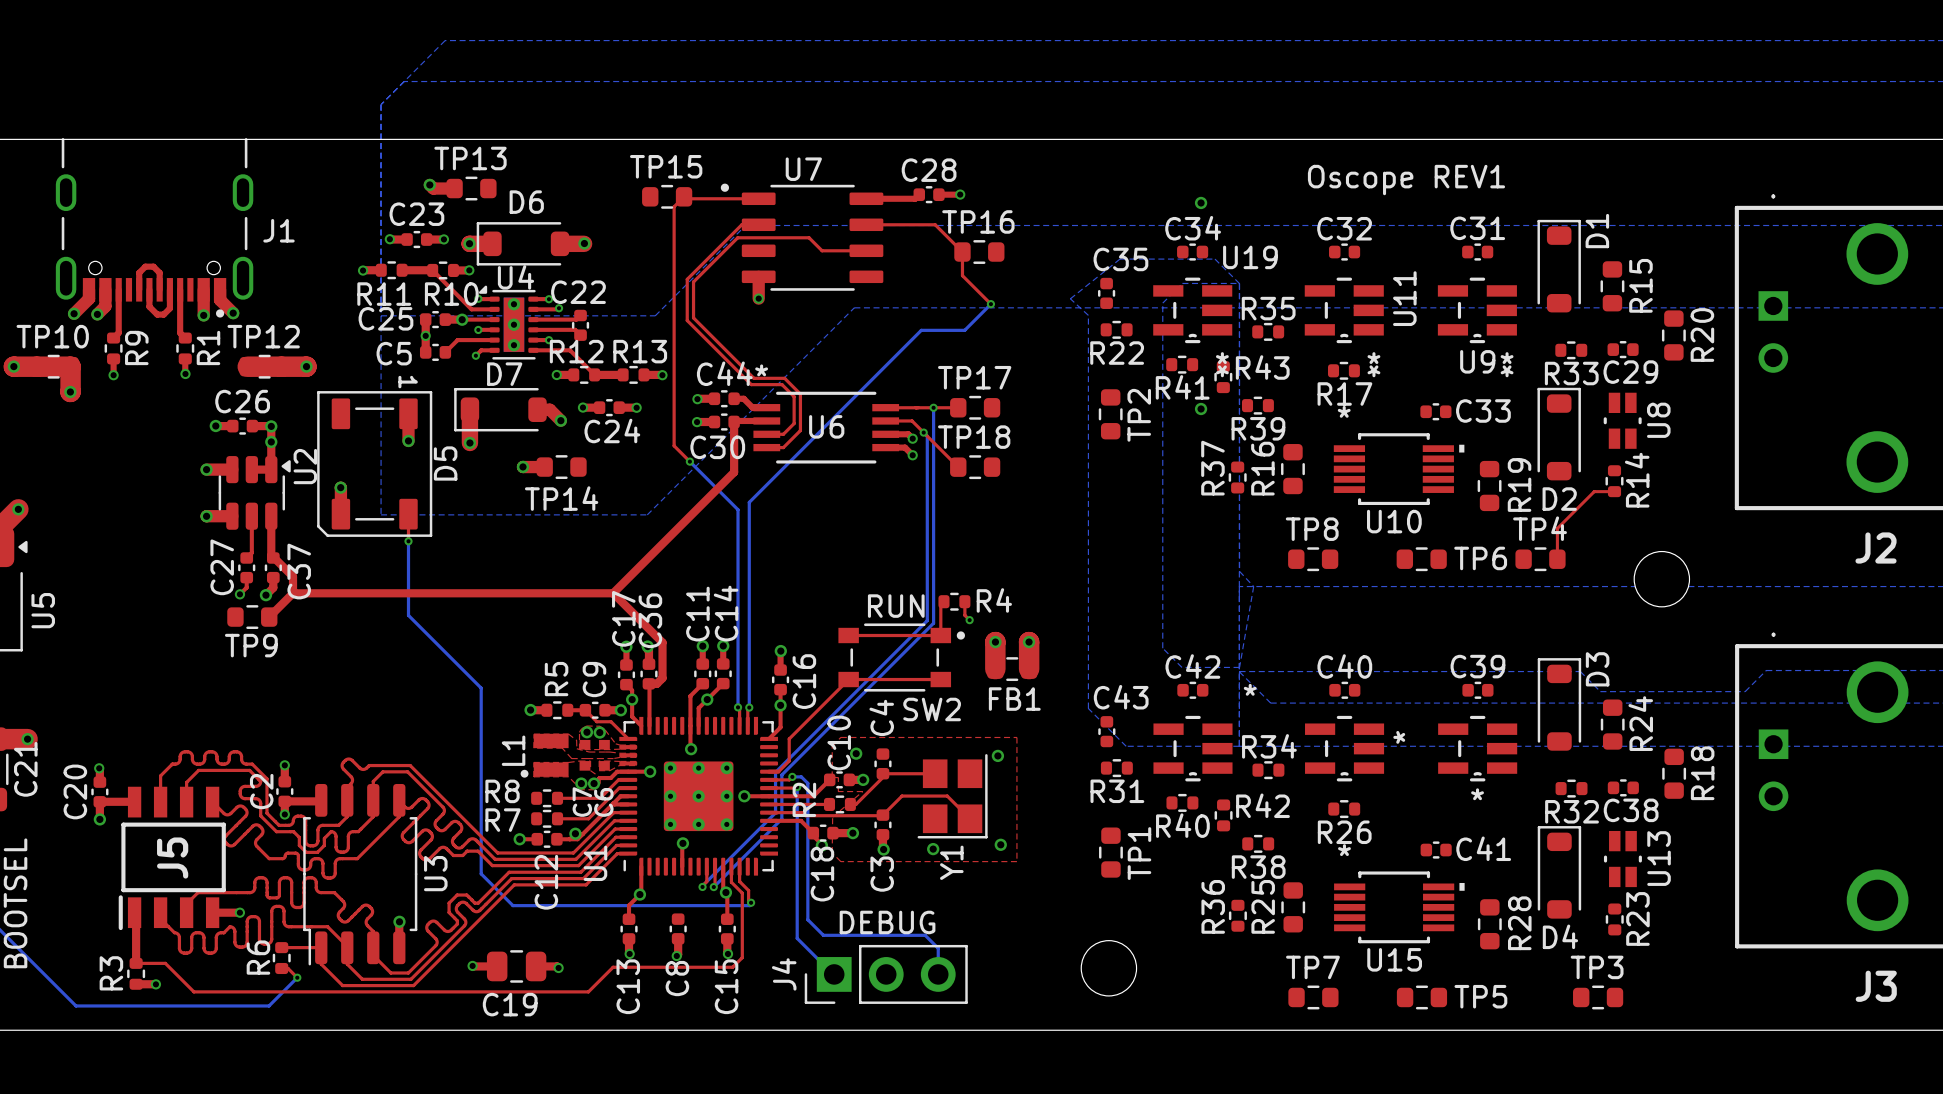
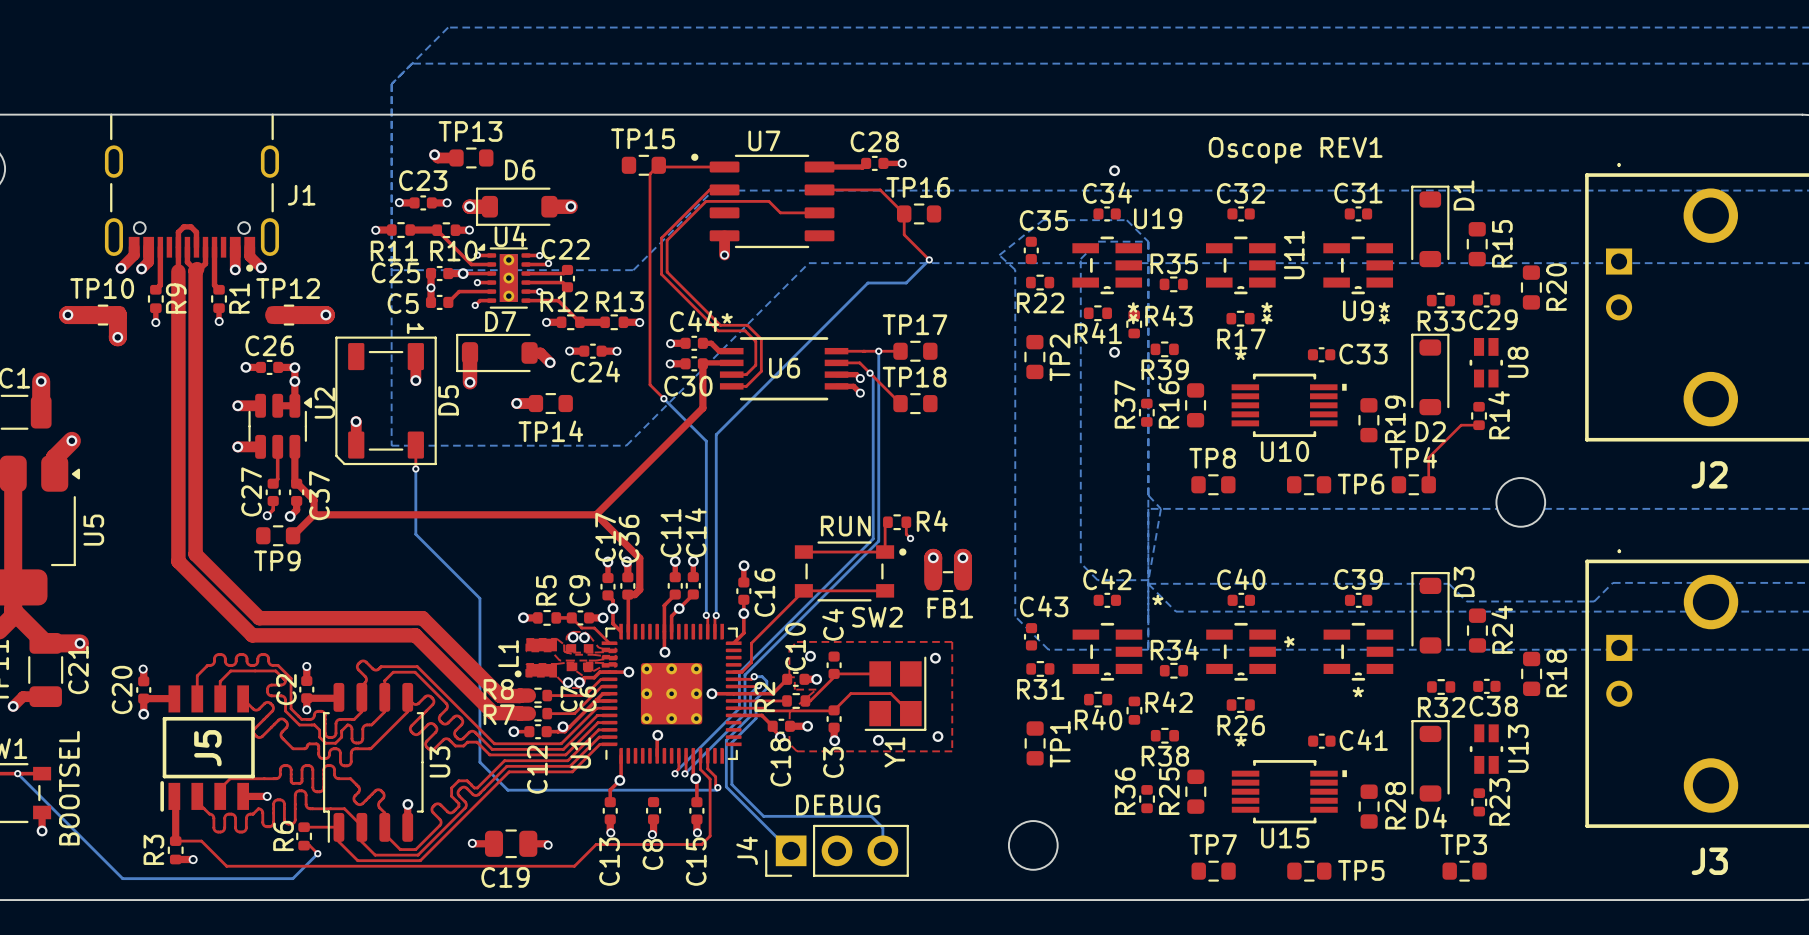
top track: none -> (178, 247) (178, 561) (252, 635) (415, 635) (493, 713) (528, 713)
top track: none -> (197, 269) (195, 270) (195, 554) (259, 618) (422, 618) (500, 696) (528, 695)
bottom track: (806, 782) (807, 919) (823, 935) -> (766, 681) (766, 688) (756, 699) (756, 718) (731, 742) (731, 784) (763, 816) (781, 816)
bottom track: (797, 787) (797, 938) -> (758, 685) (750, 693) (750, 716) (726, 740) (726, 786) (758, 819)

